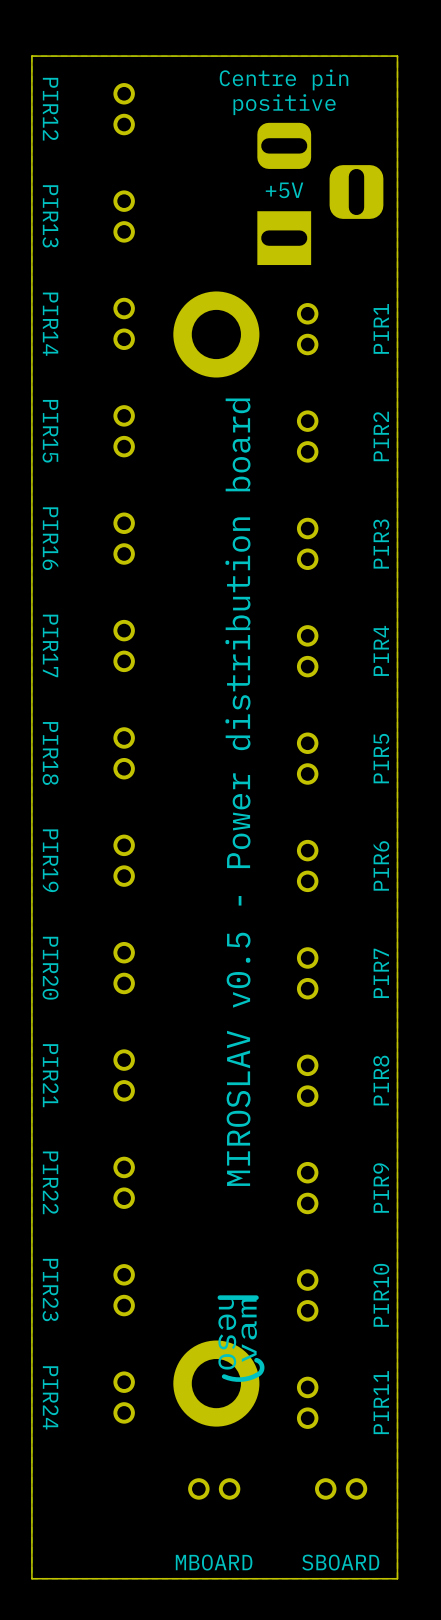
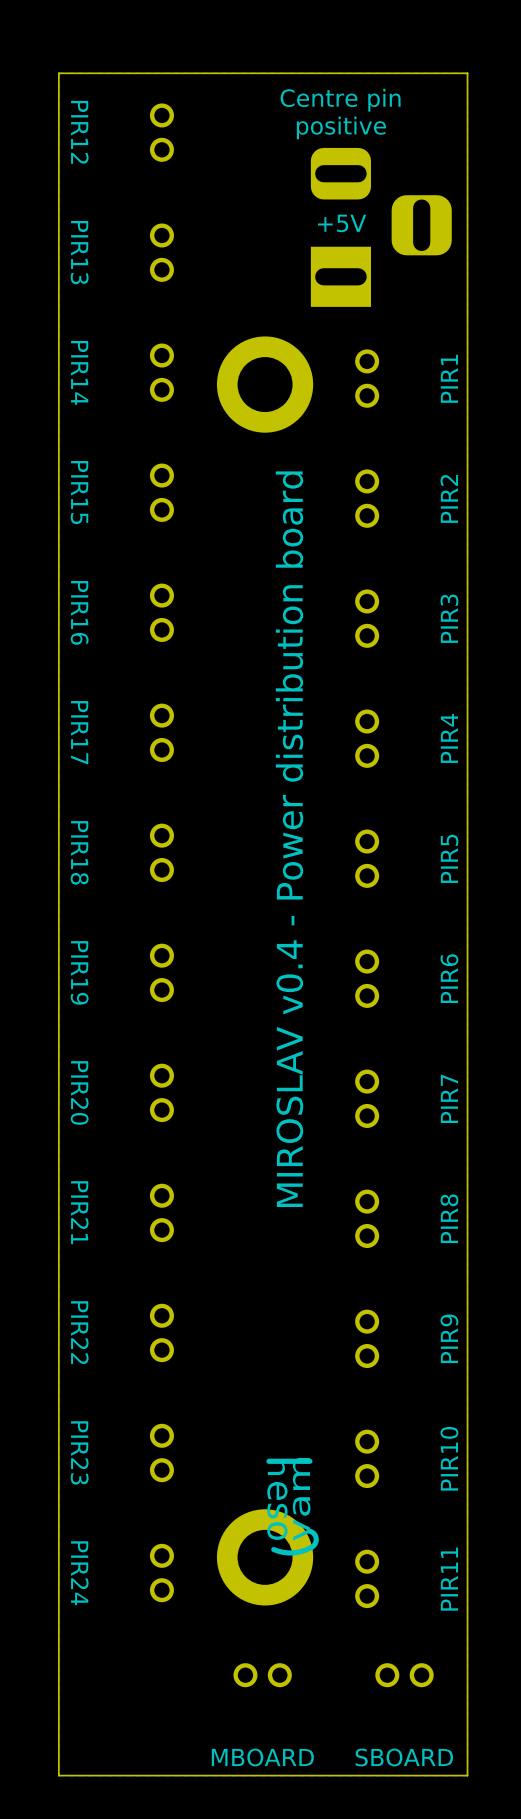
text: MIROSLAV v0.5 - Power distribution board (237, 792) -> MIROSLAV v0.4 - Power distribution board (289, 839)

